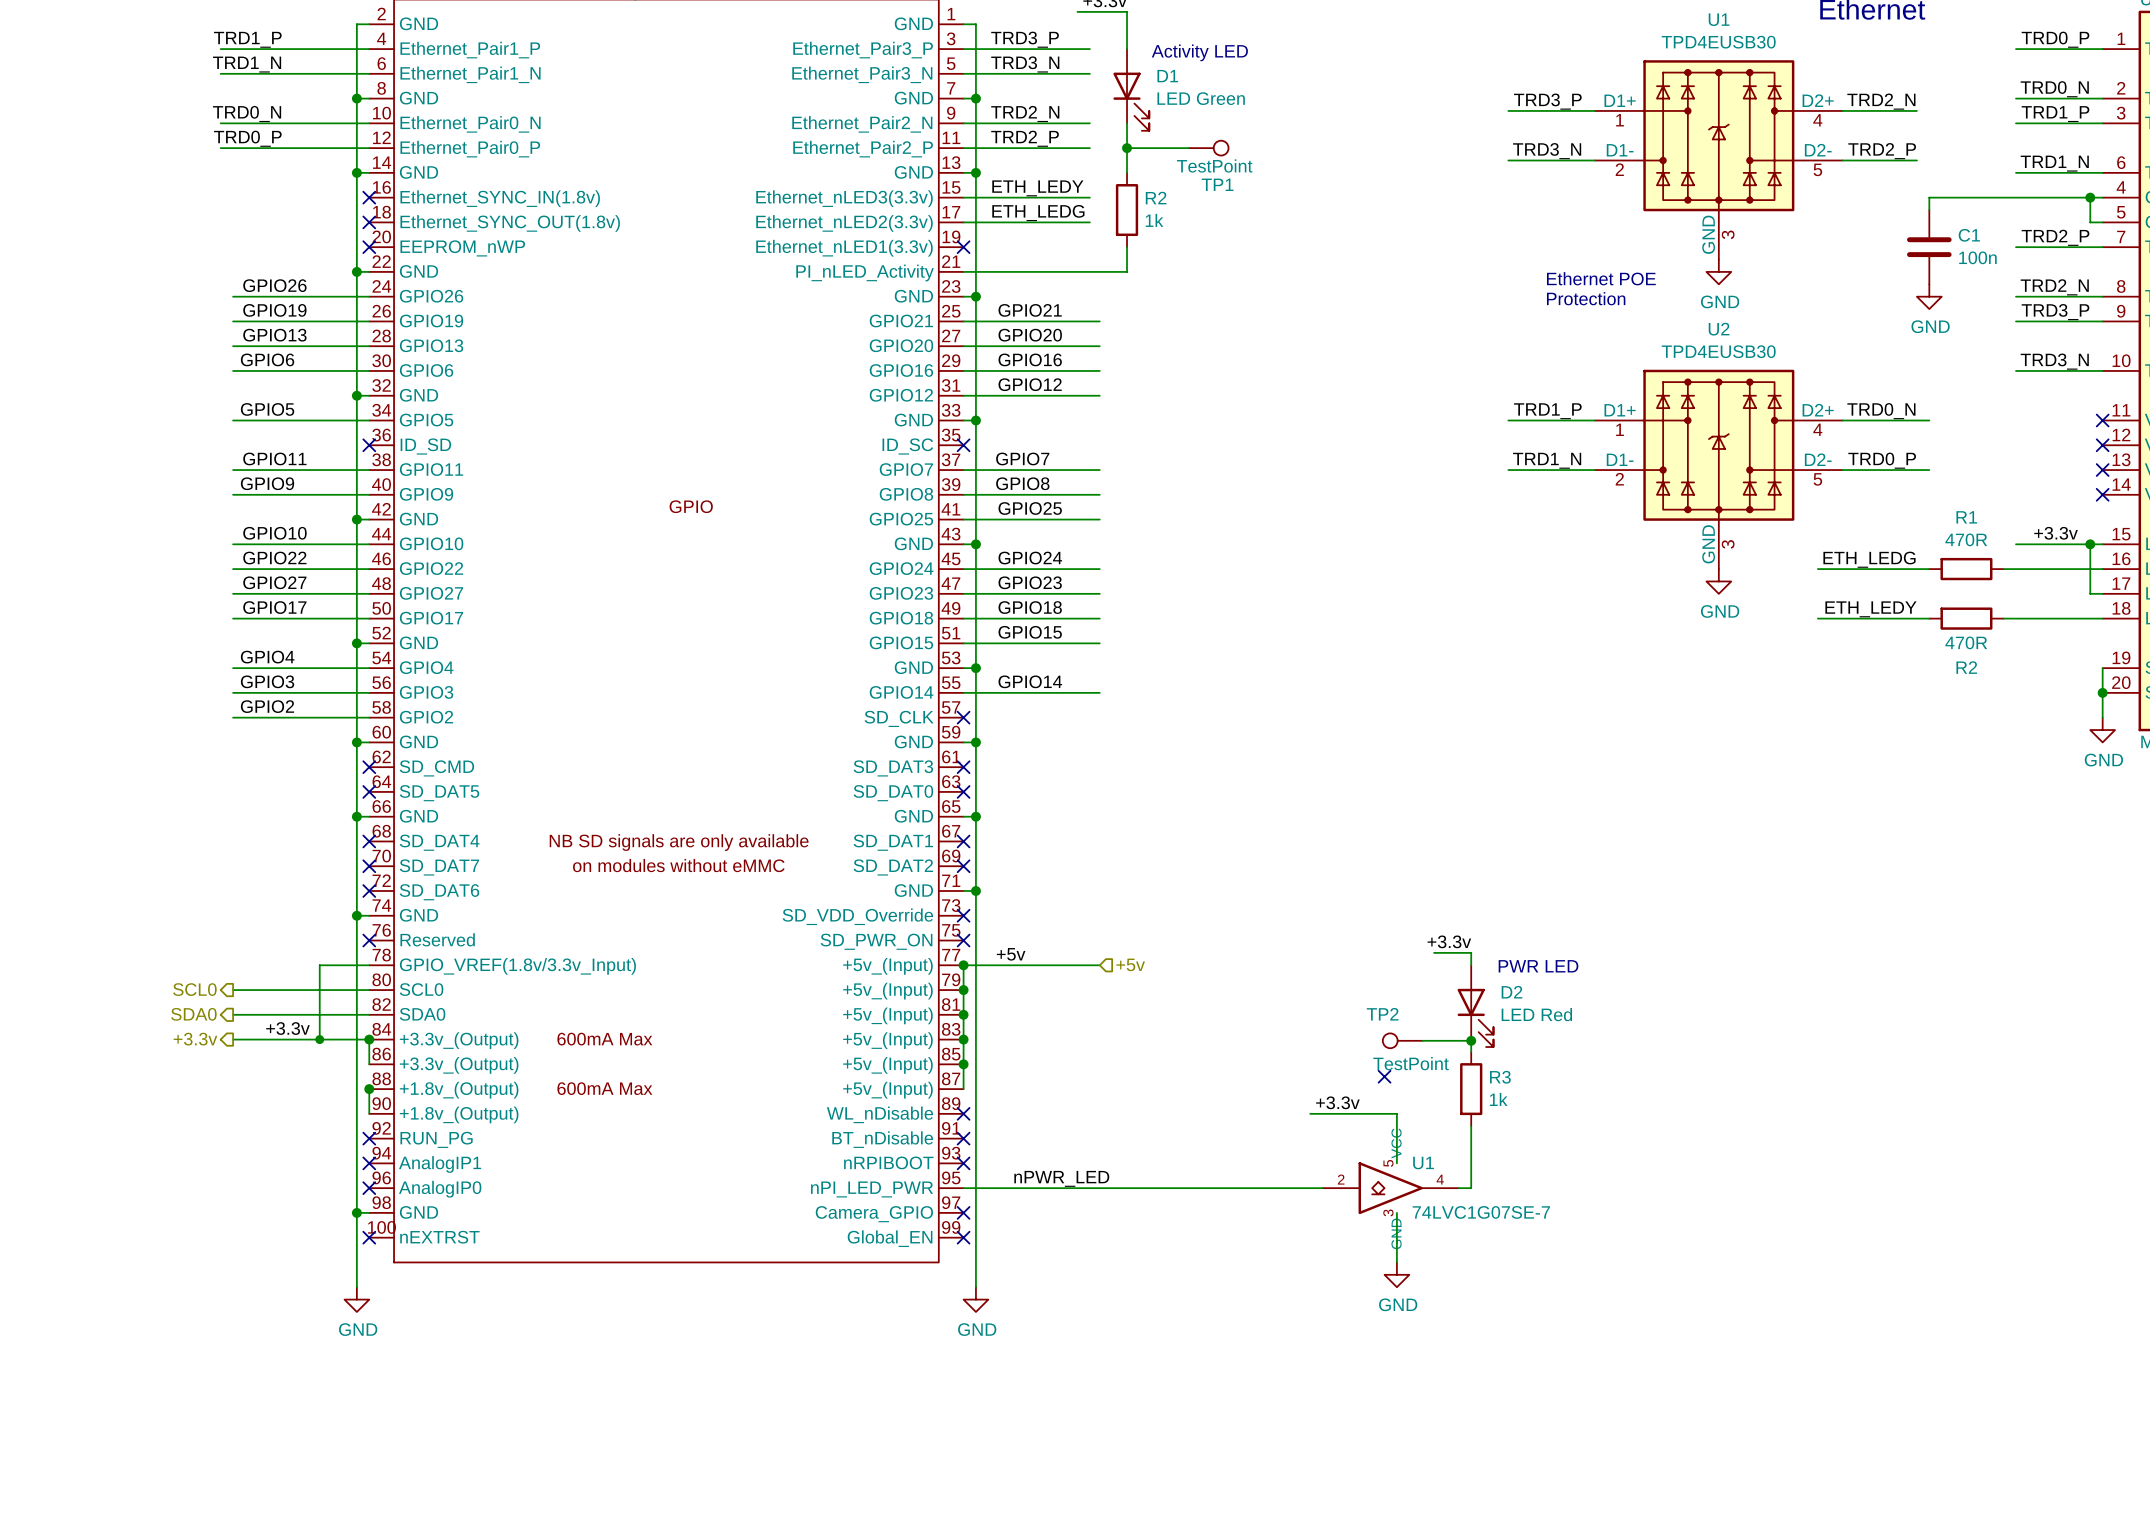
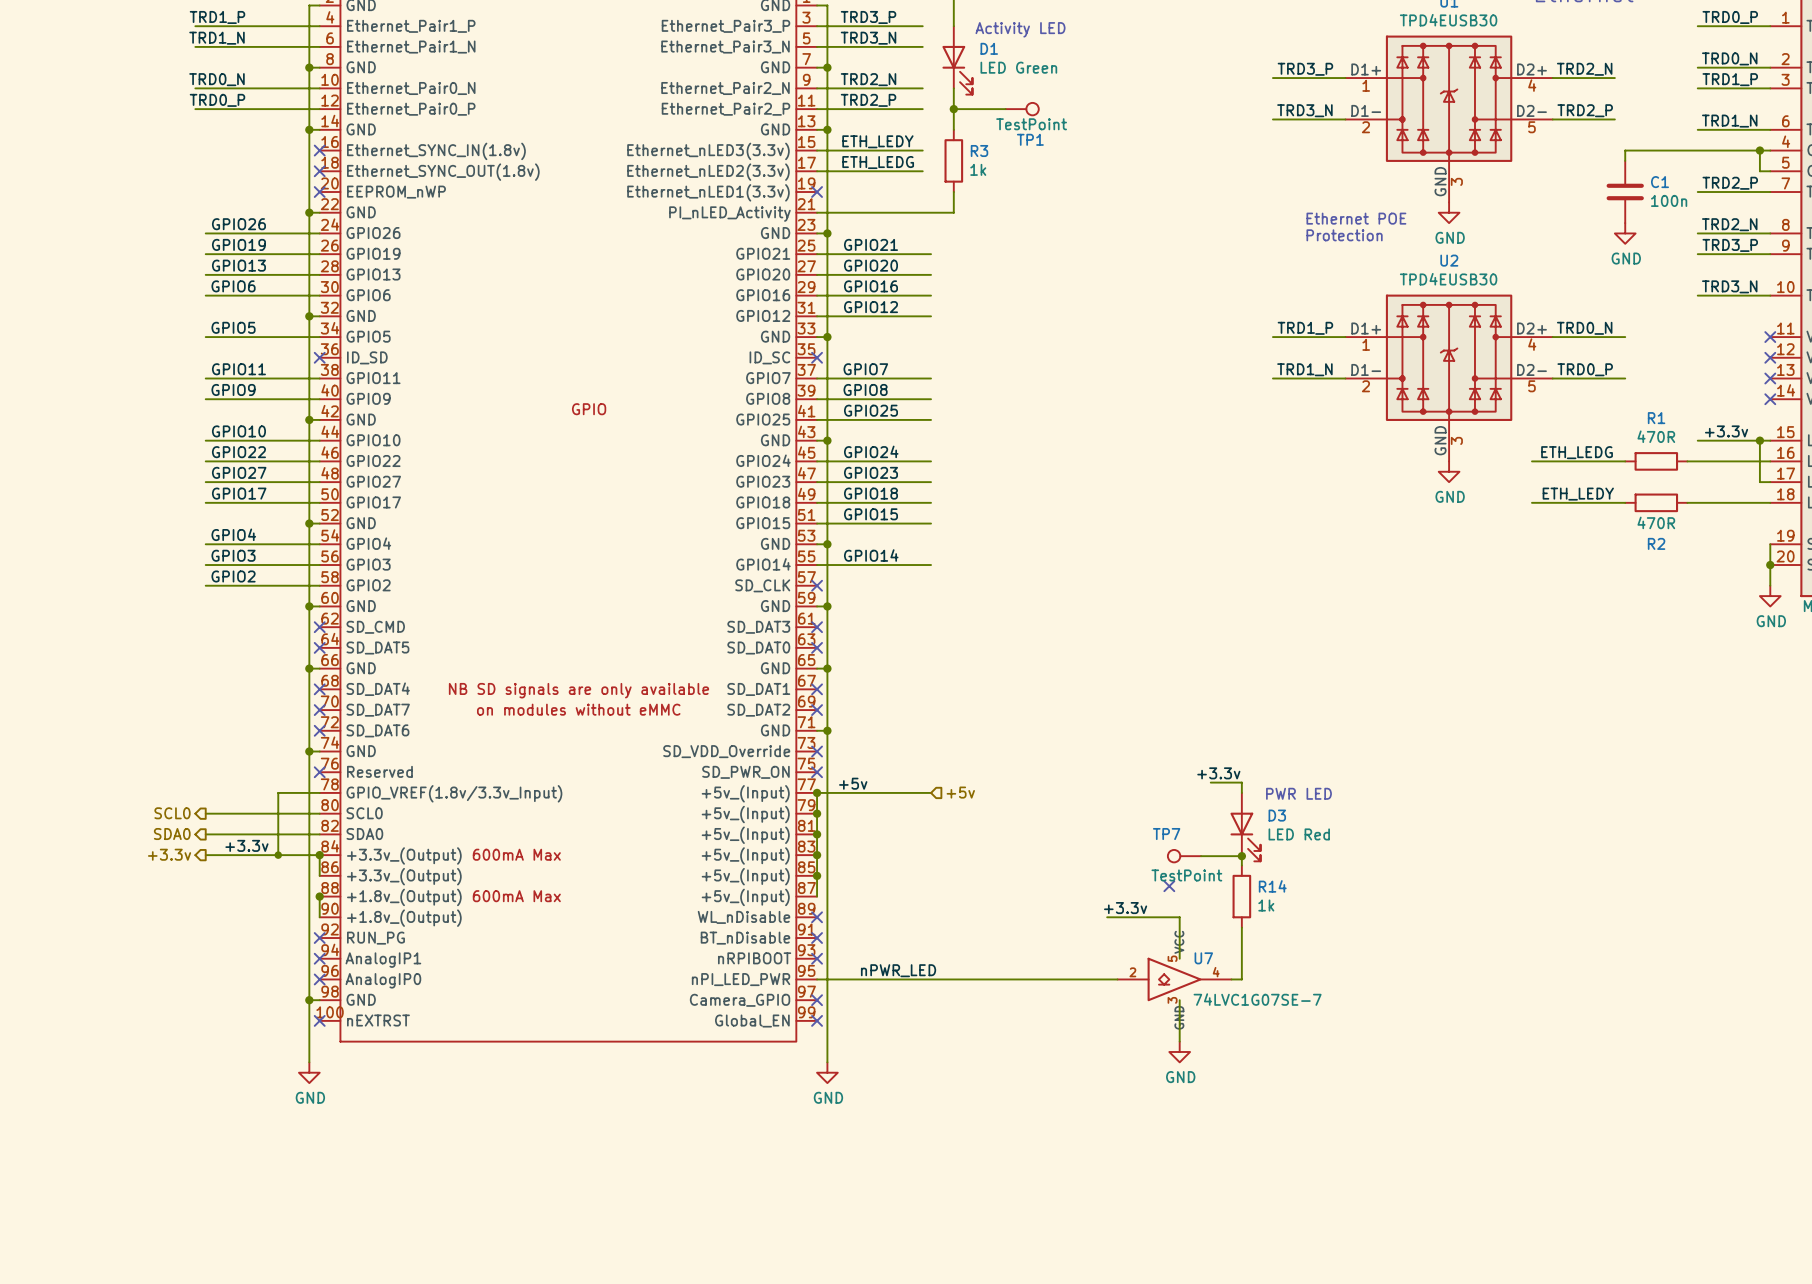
R2 name: R2 (1156, 198) -> R3 (979, 151)
D2 name: D2 (1511, 992) -> D3 (1277, 815)
TP2 name: TP2 (1382, 1014) -> TP7 (1166, 834)
R3 name: R3 (1500, 1077) -> R14 (1272, 886)
U1 name: U1 (1423, 1163) -> U7 (1203, 958)

